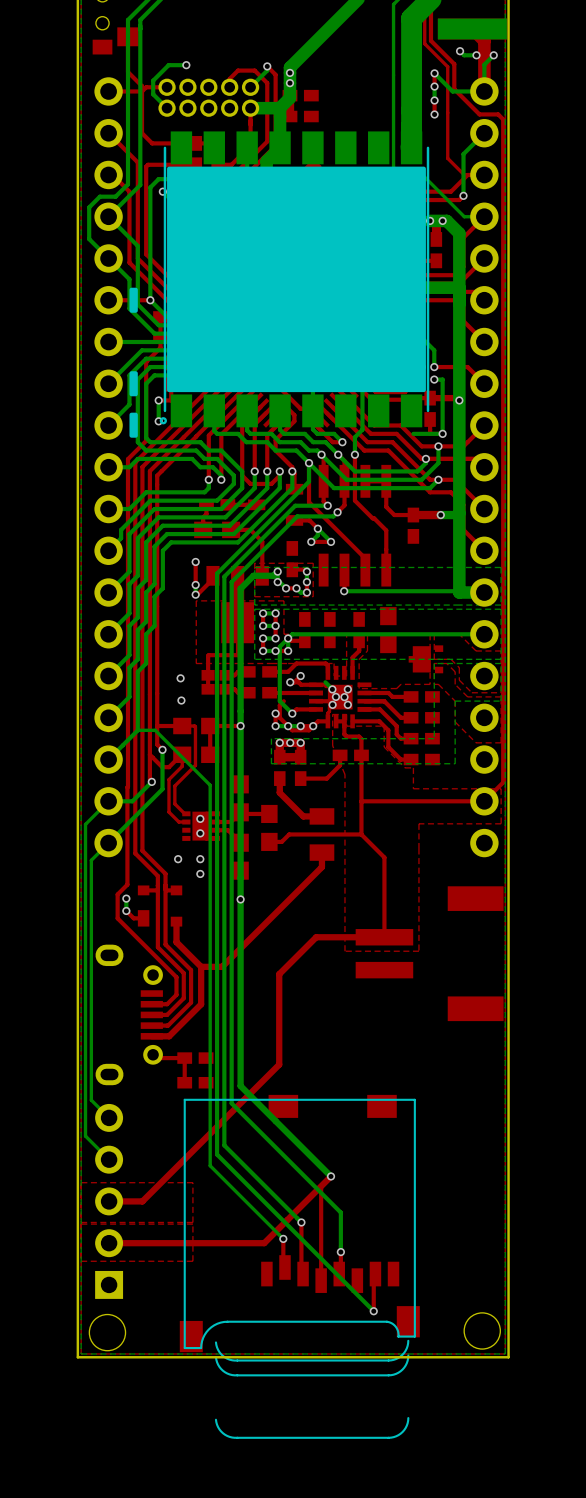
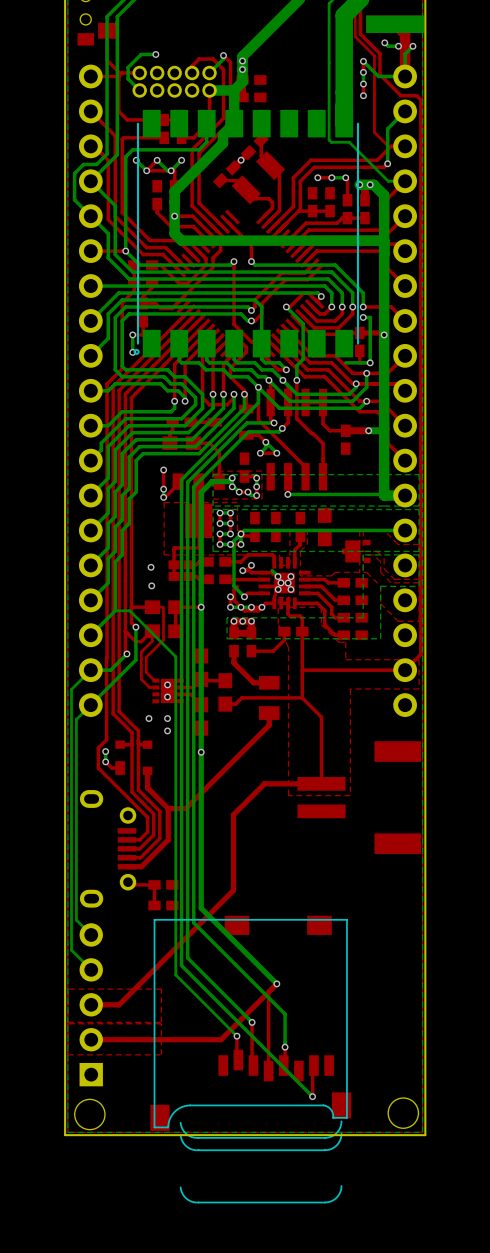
drawing: [167, 166, 426, 393] -> none
drawing: [129, 287, 138, 313] -> none
drawing: [129, 371, 138, 438] -> none

